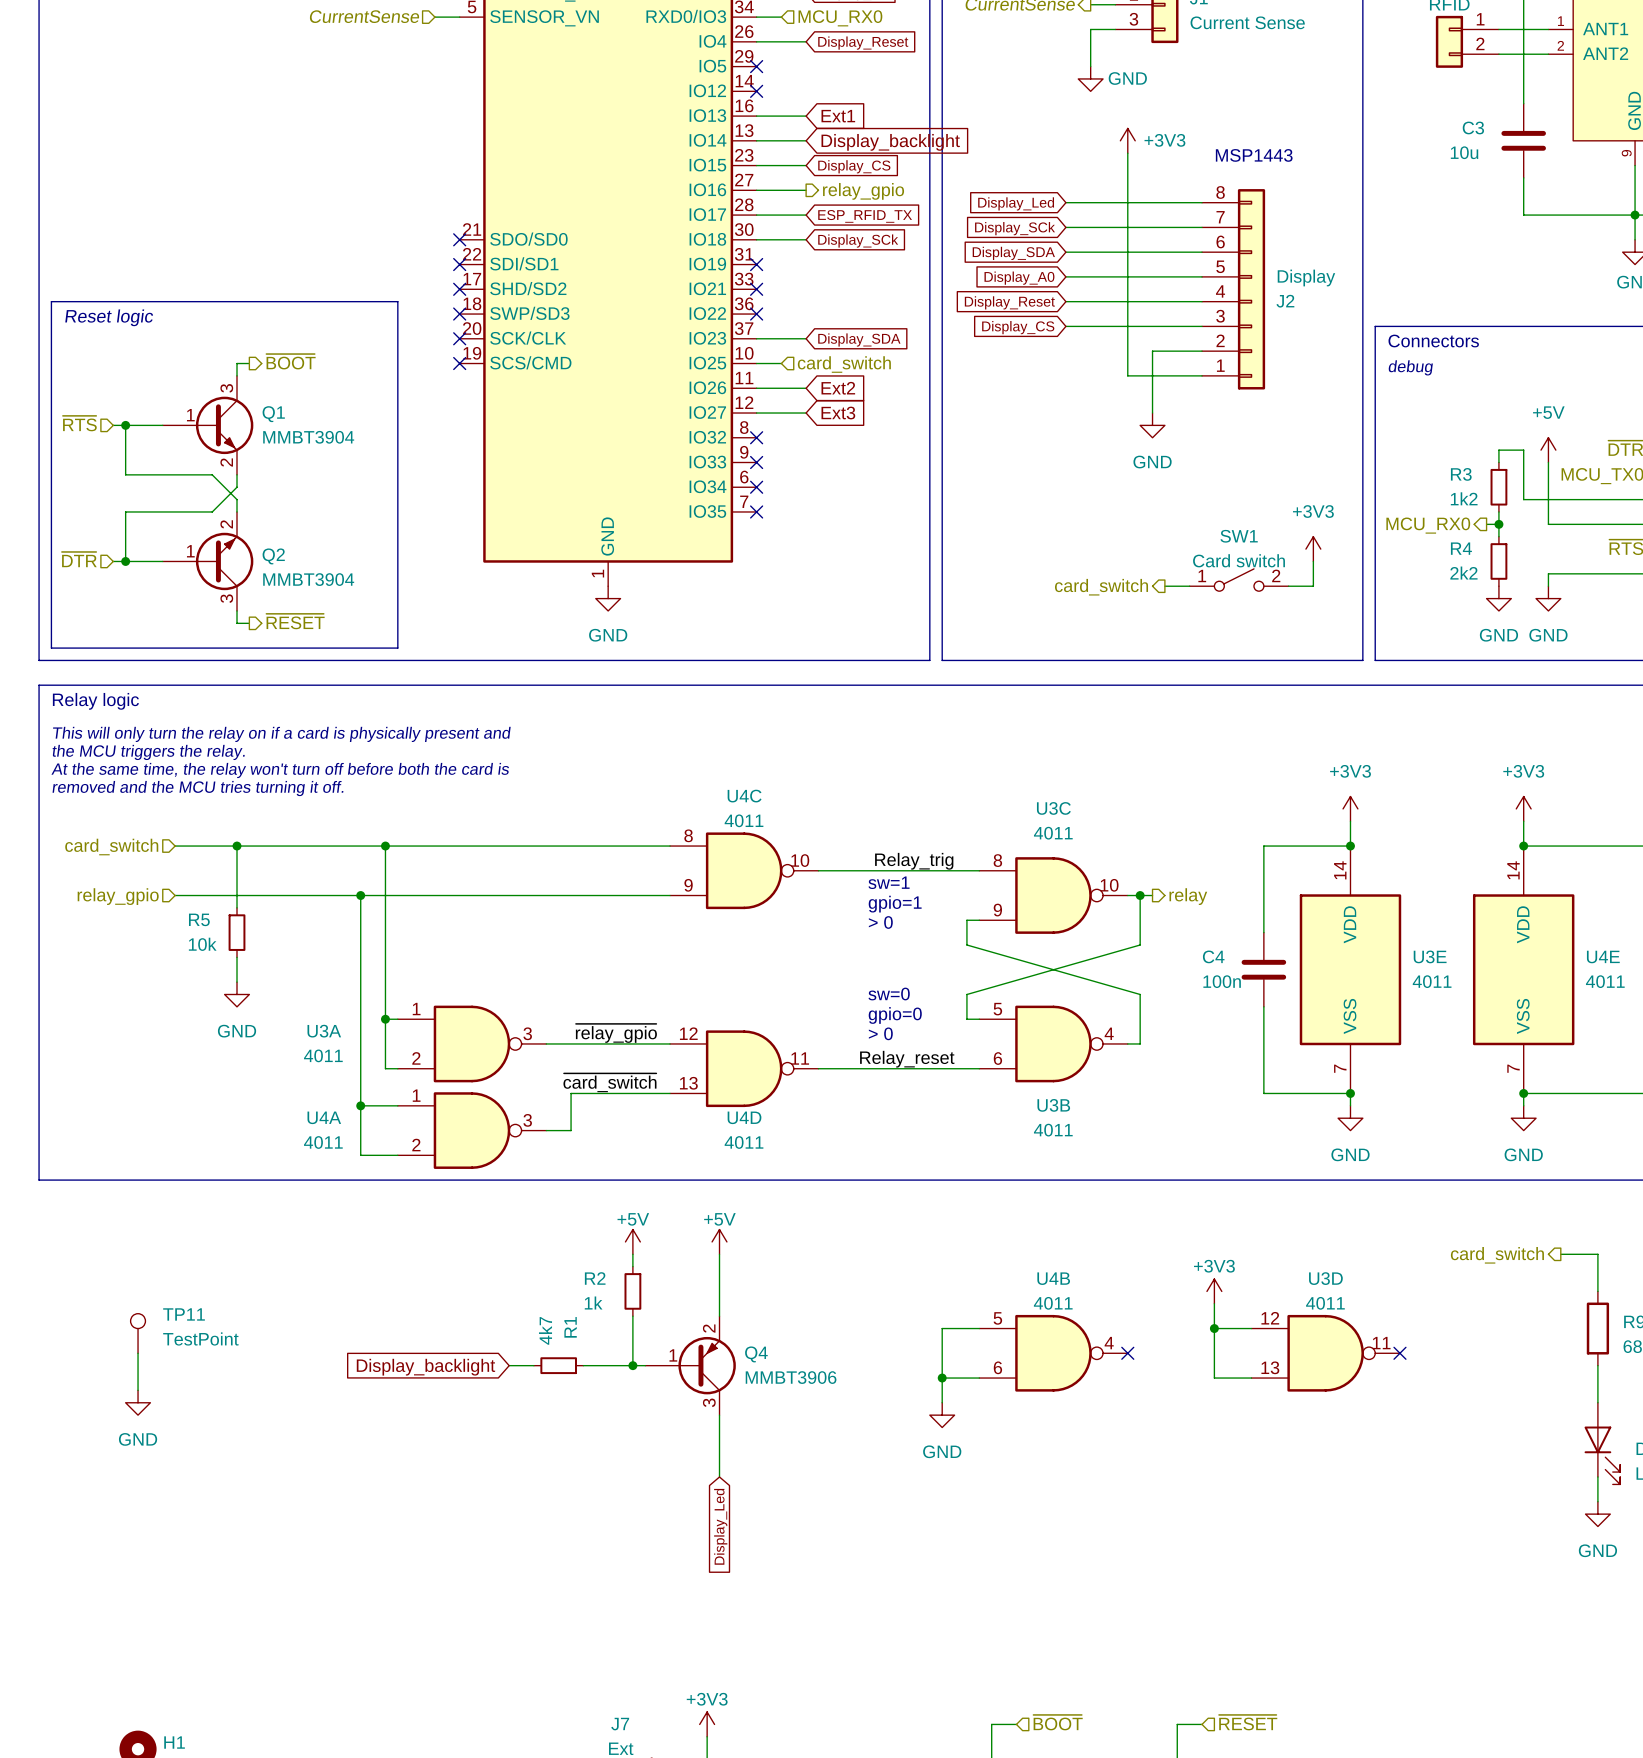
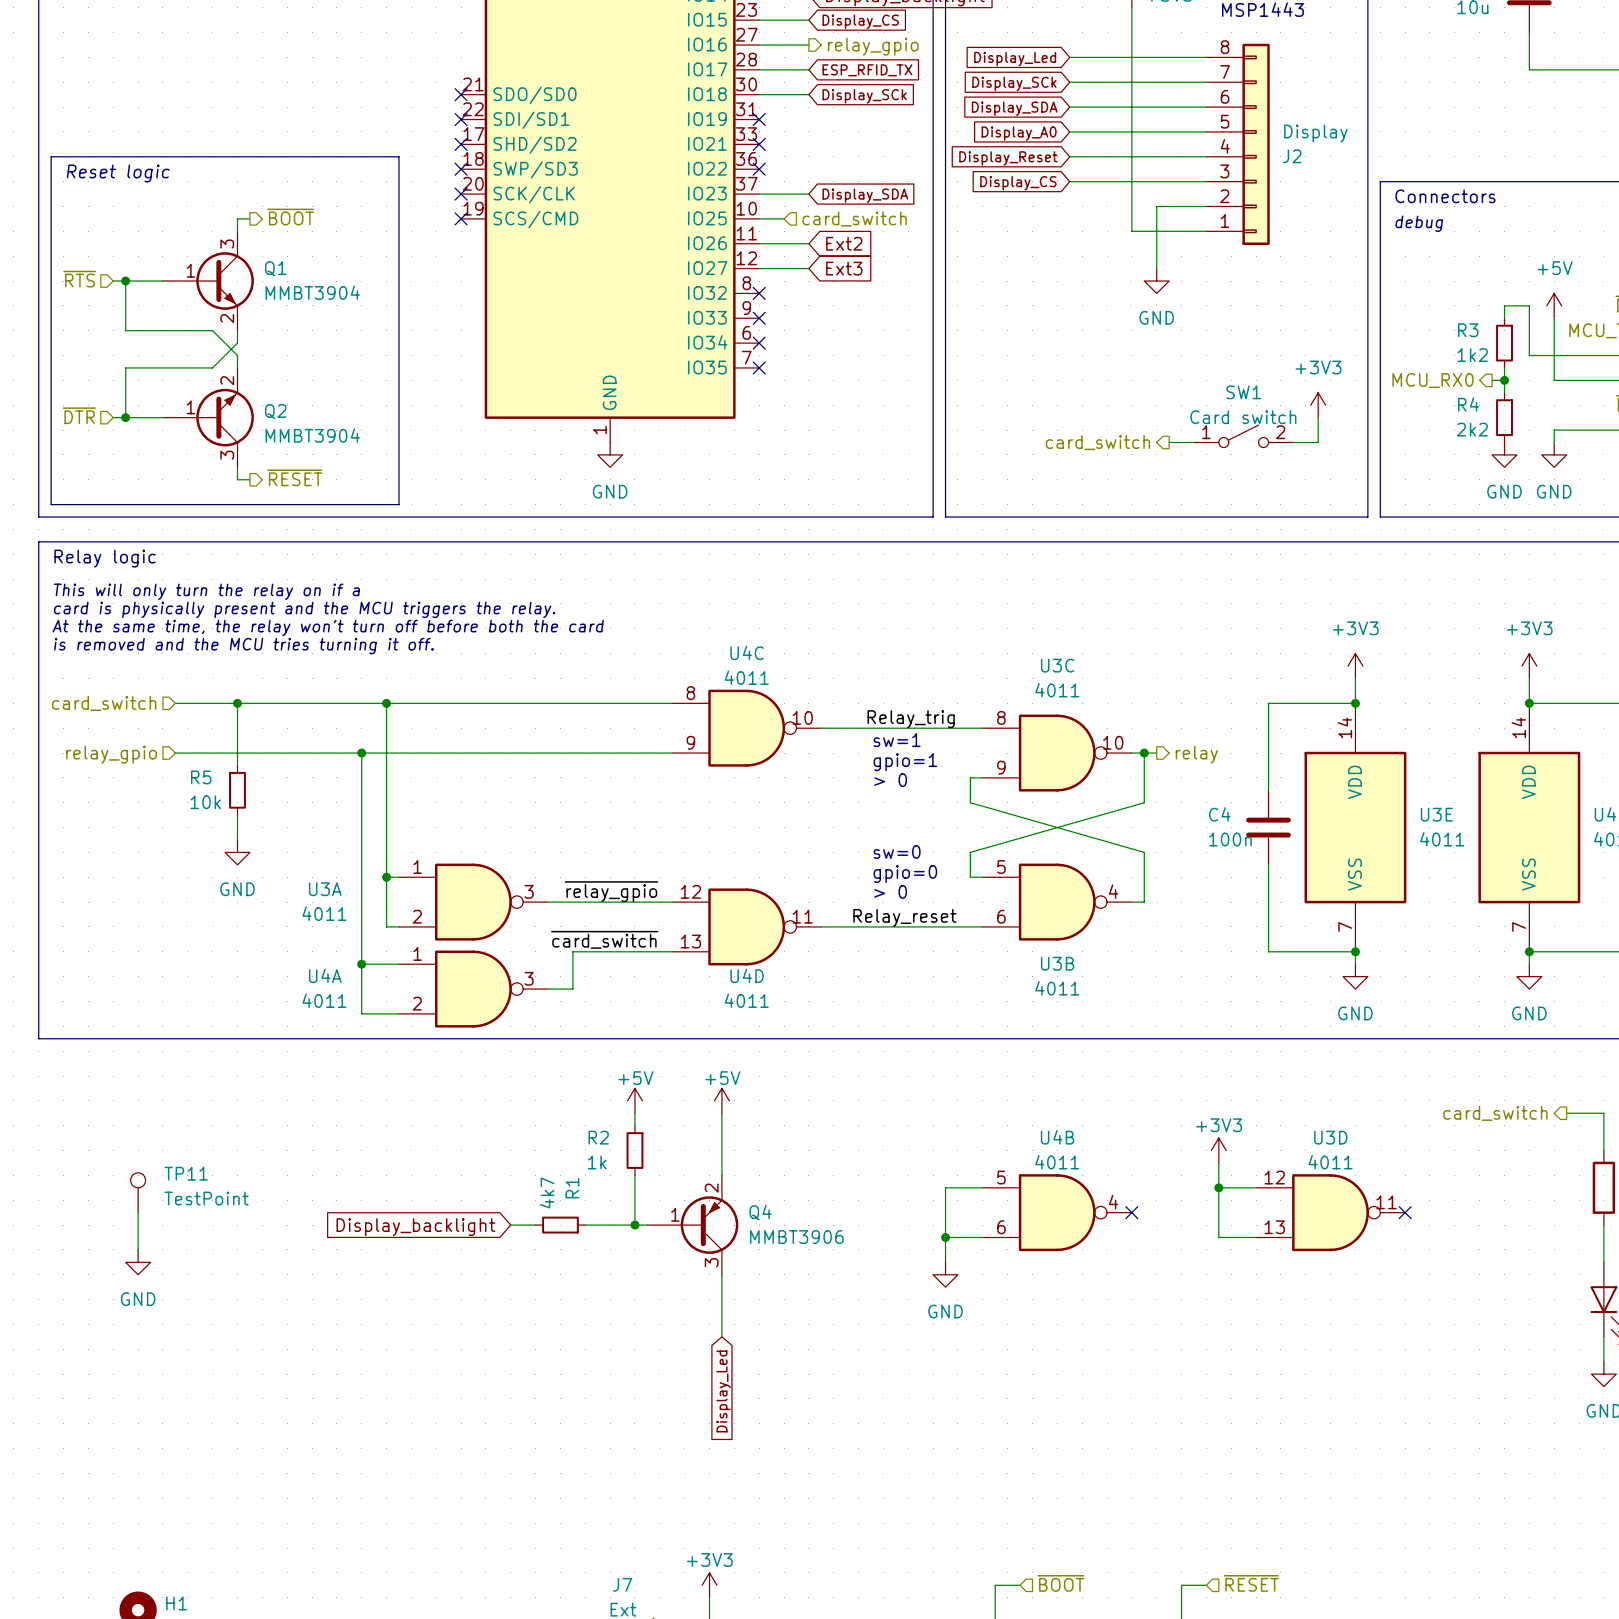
text: This will only turn the relay on if a card is physically present and (281, 734) -> This will only turn the relay on if a (206, 591)
text: the MCU triggers the relay. (148, 752) -> card is physically present and the MCU triggers the relay. (304, 609)
text: At the same time, the relay won't turn off before both the card is (280, 770) -> At the same time, the relay won't turn off before both the card (328, 627)
text: removed and the MCU tries turning it off. (197, 788) -> is removed and the MCU tries turning it off. (243, 646)

